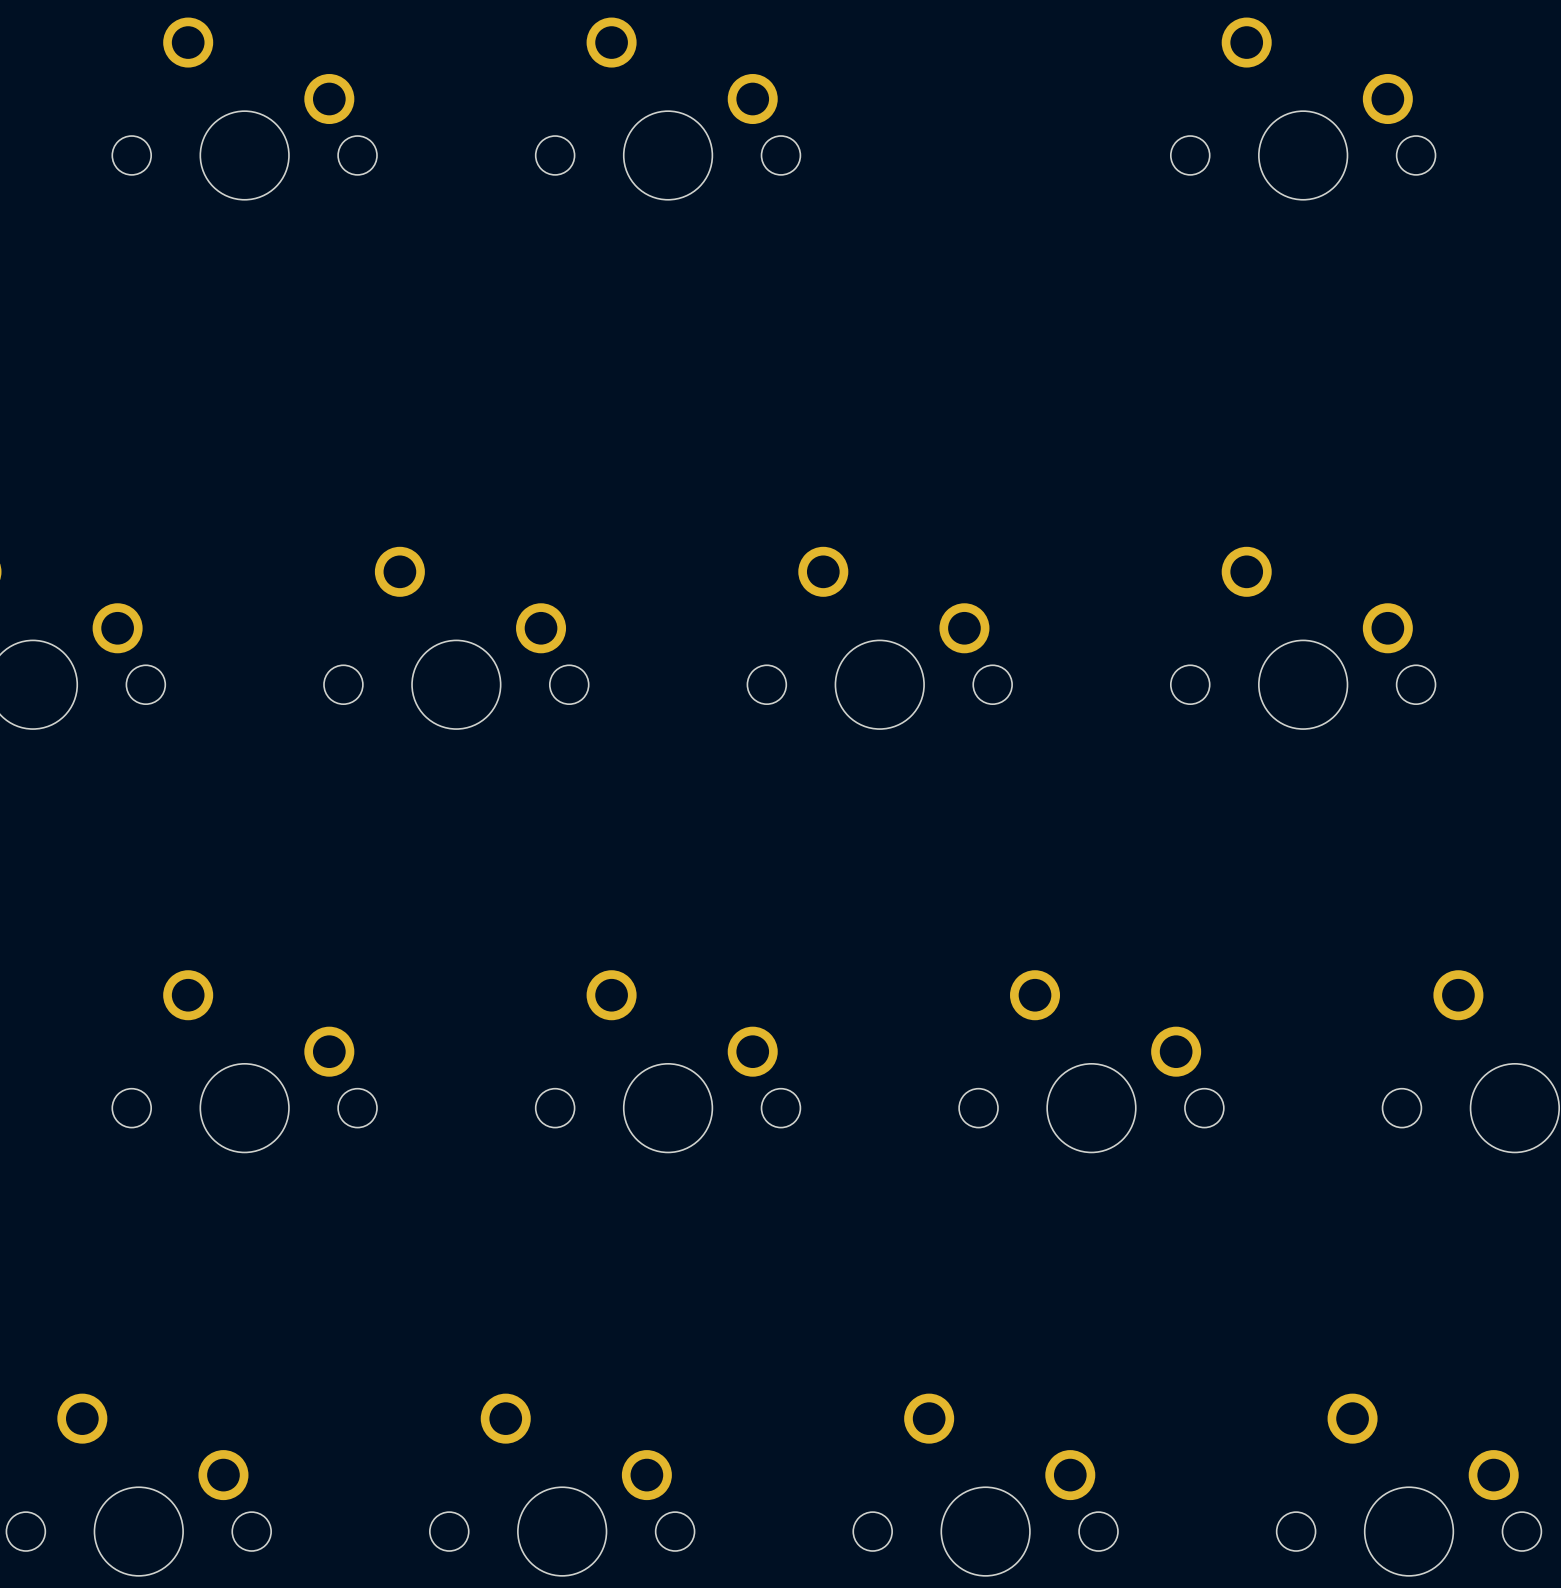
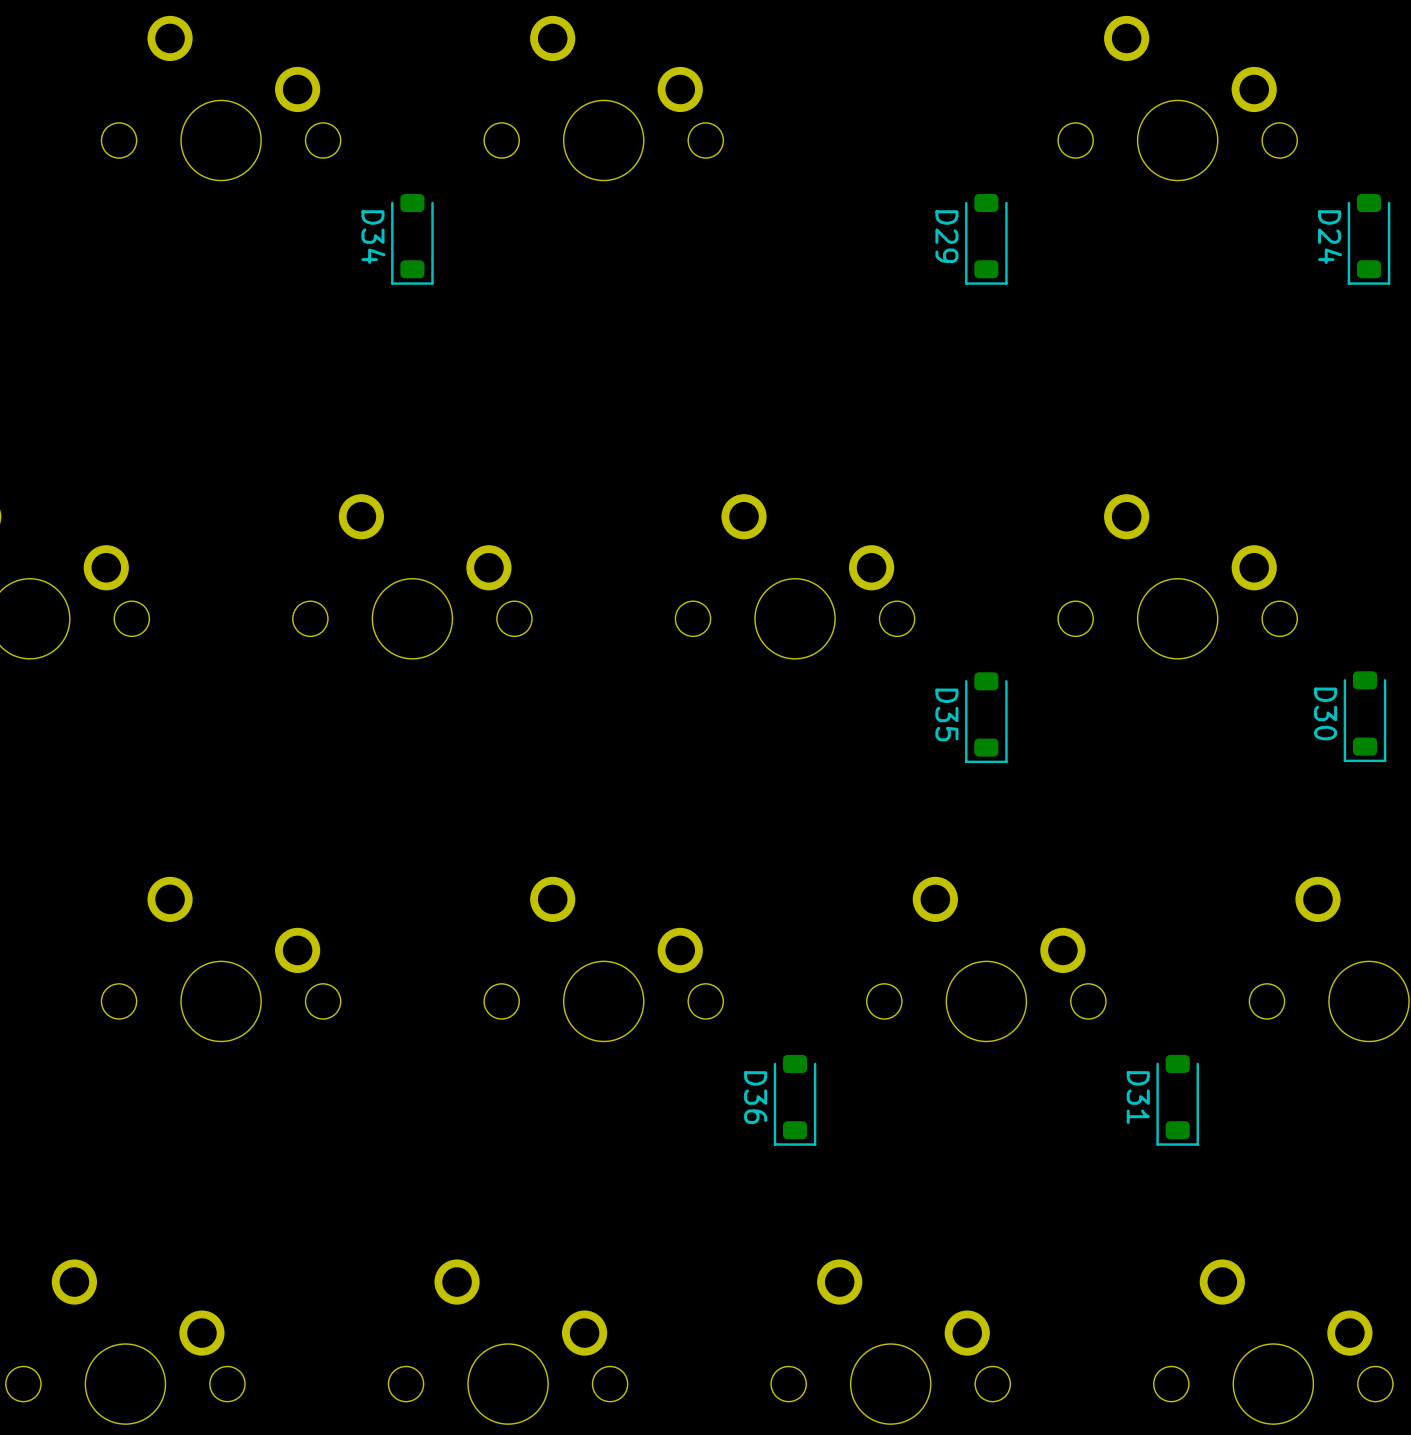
D34: none -> (412, 239)
D29: none -> (986, 239)
D24: none -> (1369, 239)
D30: none -> (1364, 716)
D35: none -> (986, 717)
D36: none -> (795, 1100)
D31: none -> (1177, 1100)

